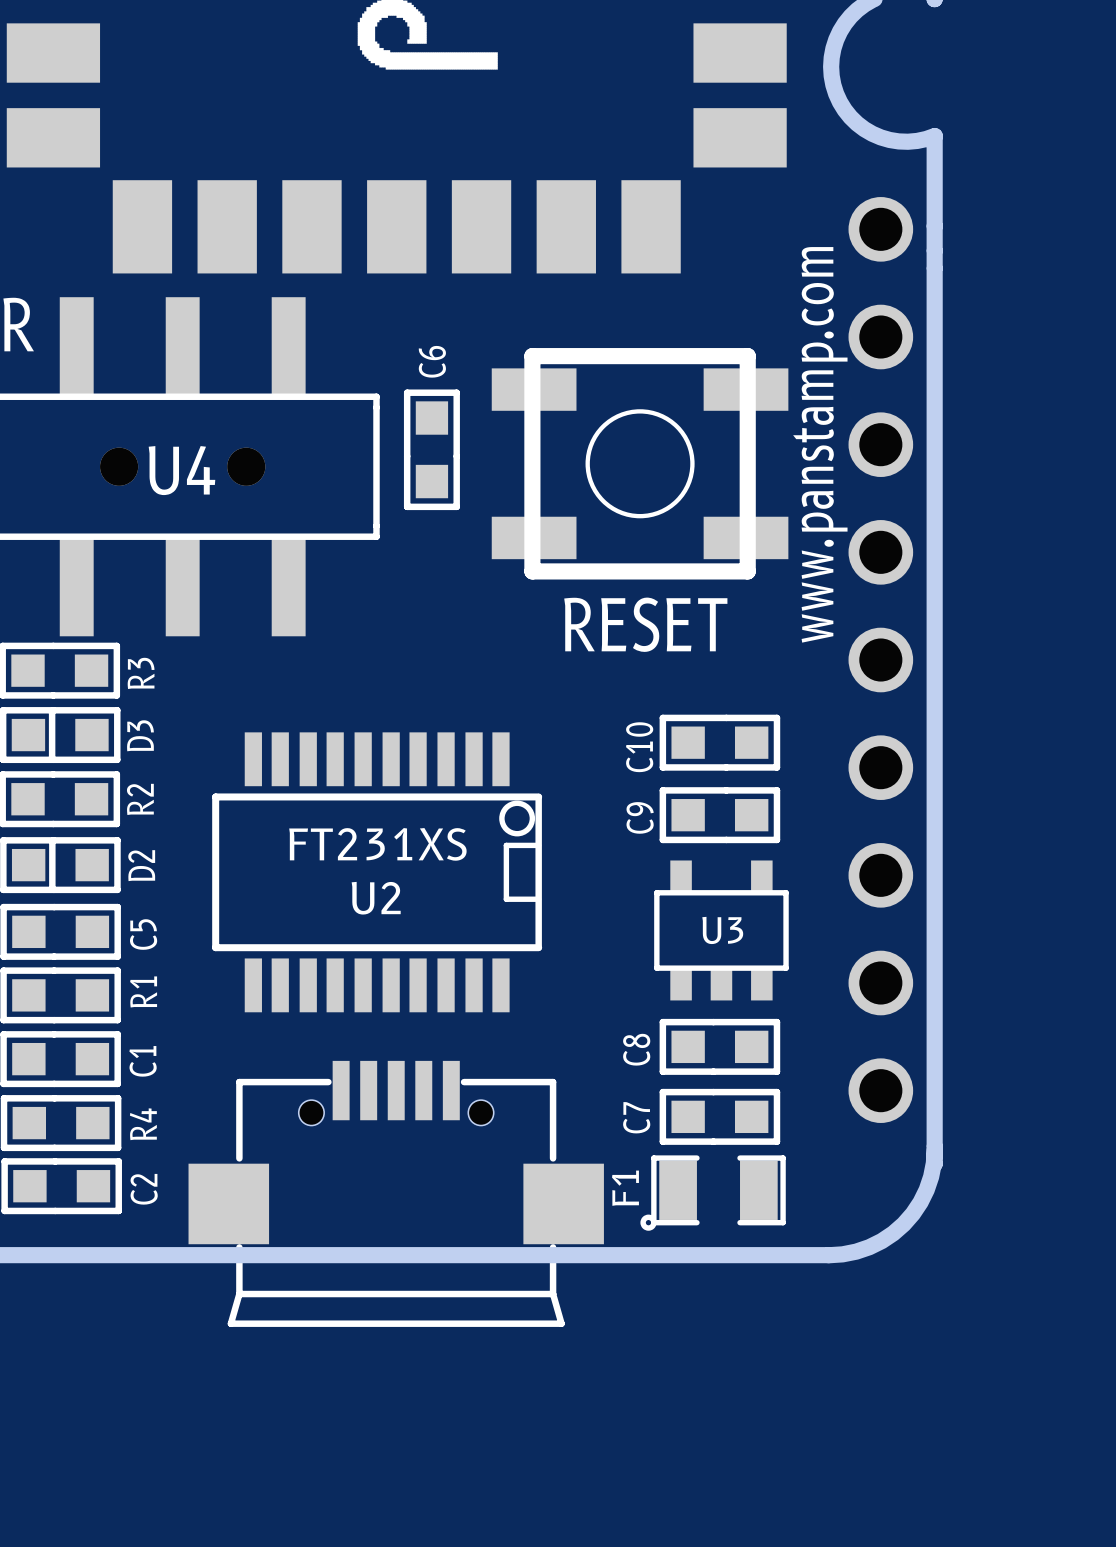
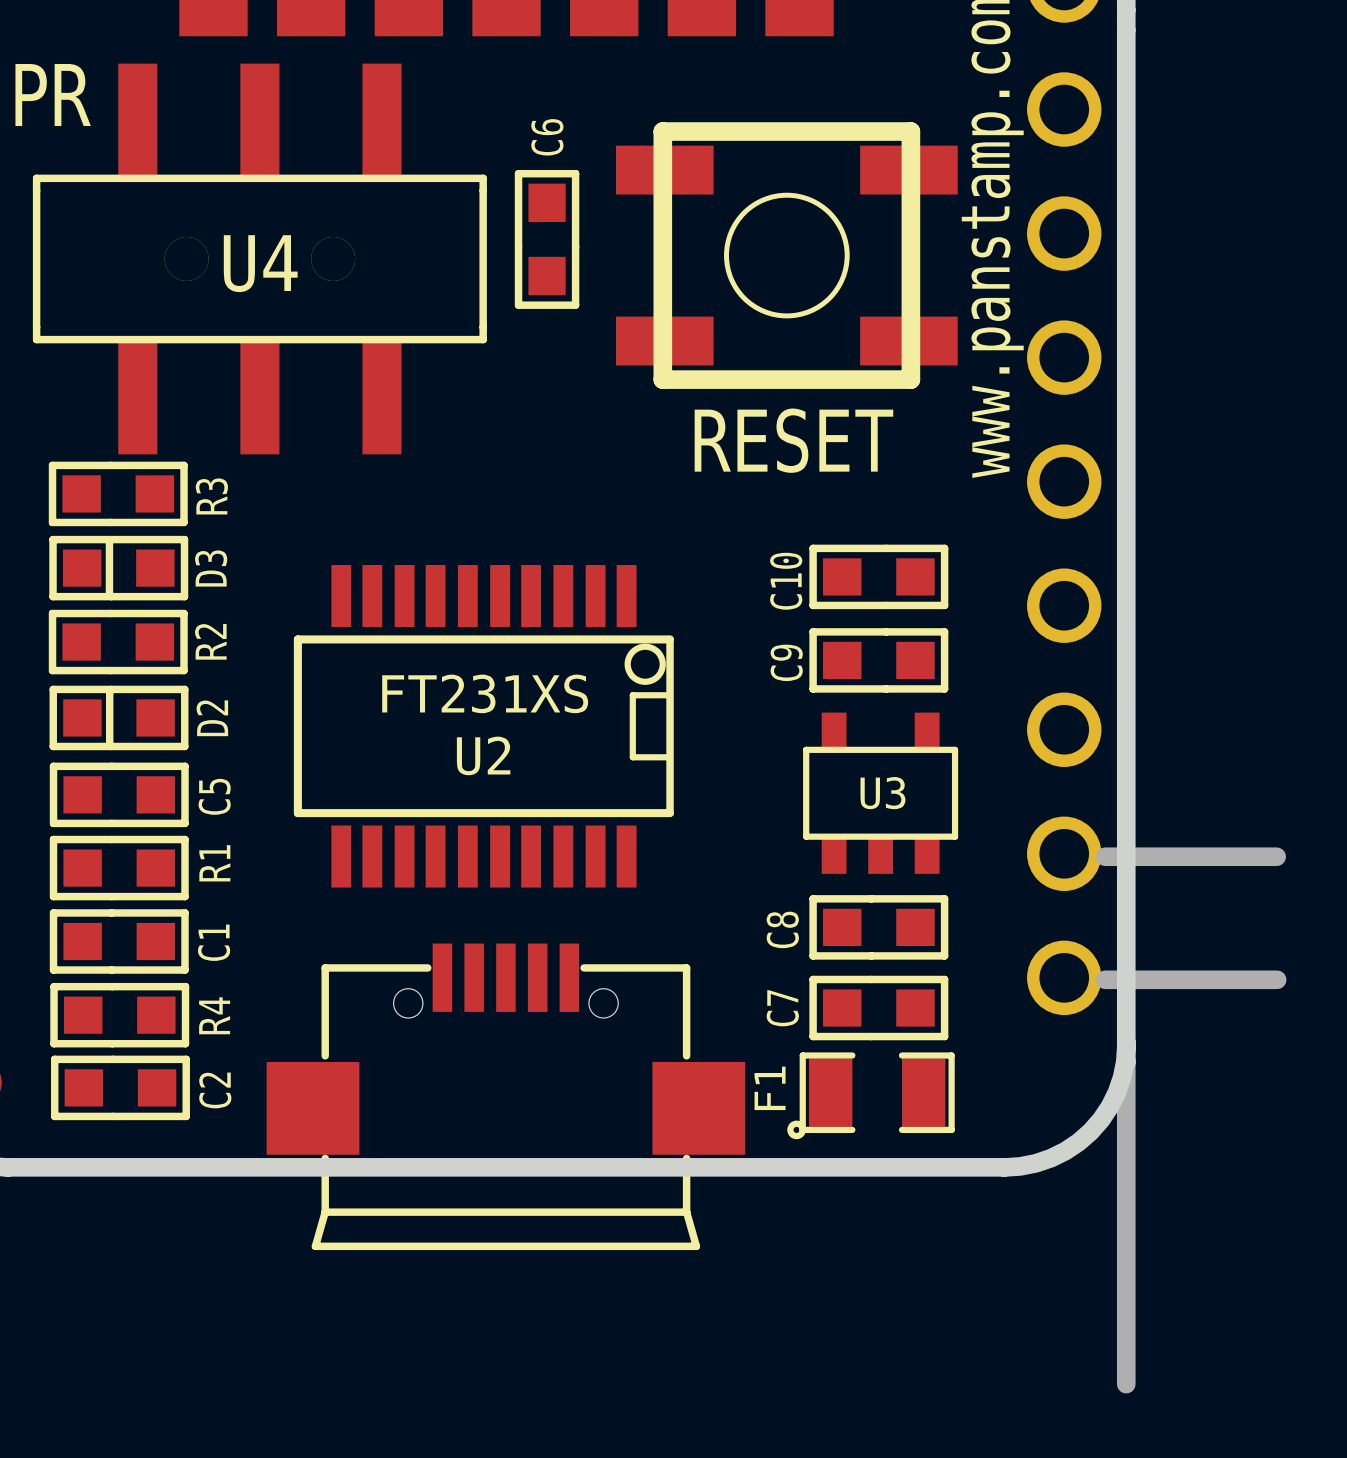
line: none -> (1105, 856) (1276, 856)
line: none -> (1105, 979) (1277, 979)
line: none -> (1126, 1058) (1126, 1384)

